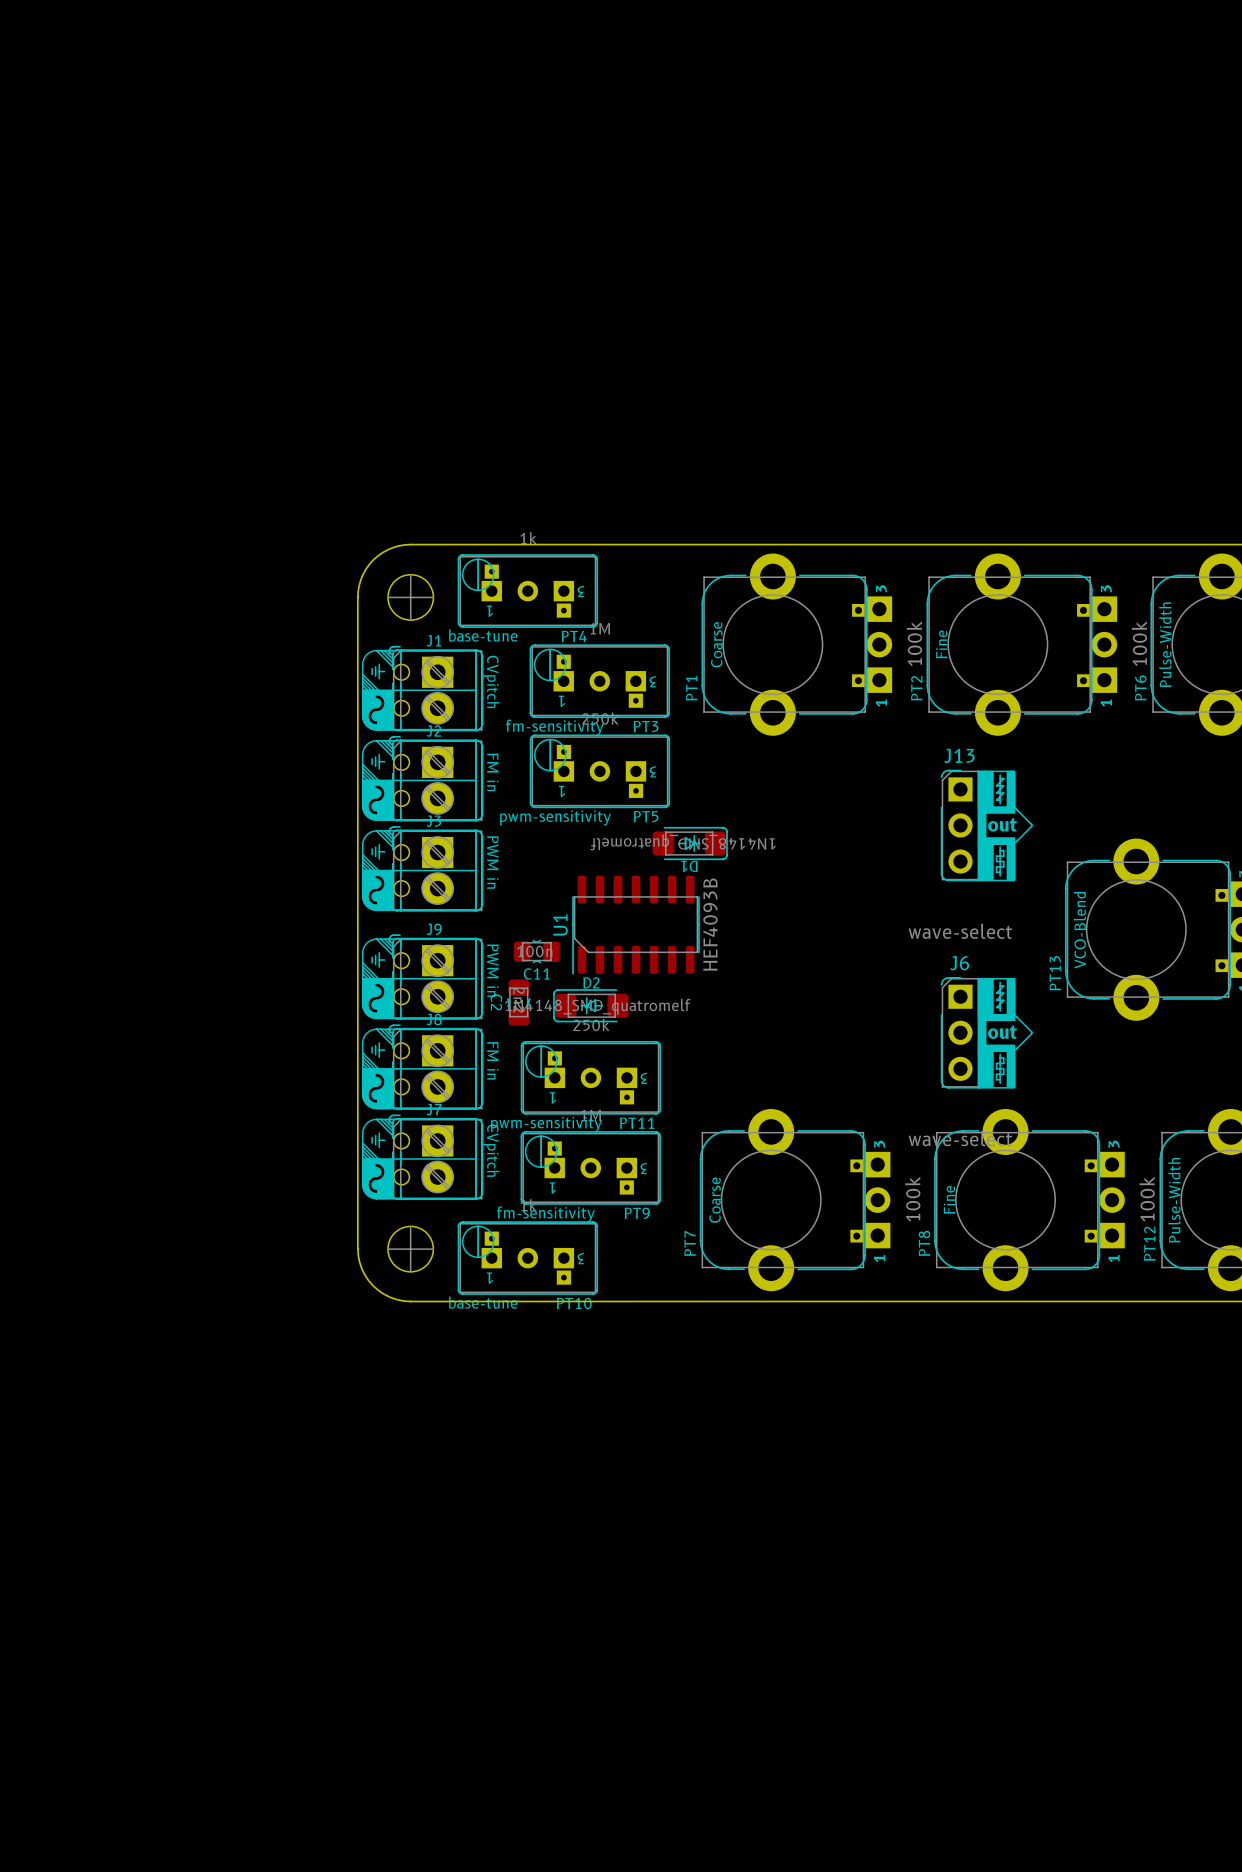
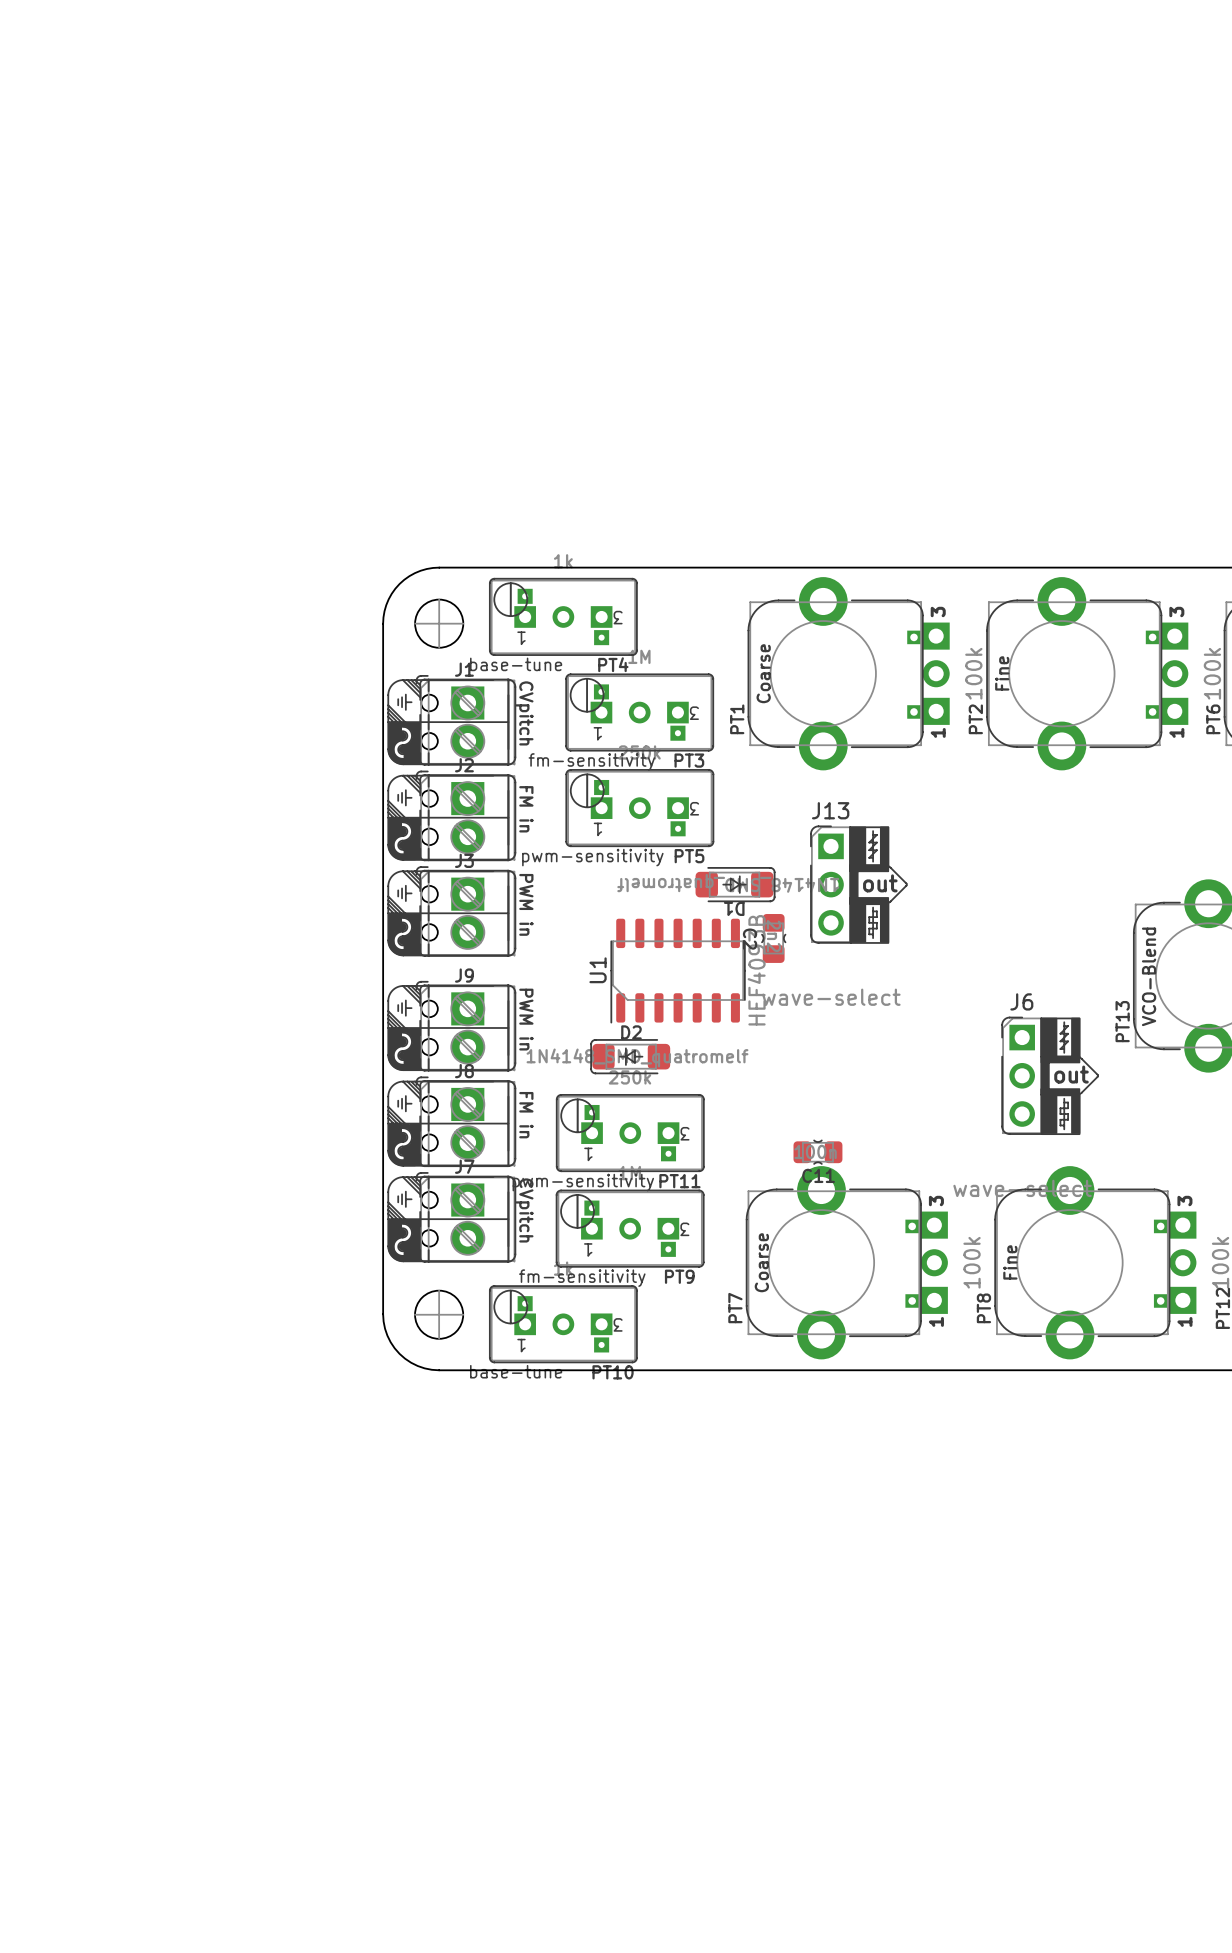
J13 footprint: [940, 769, 1033, 882] -> [810, 825, 908, 944]
C11 position: (536, 951) -> (817, 1152)
J6 footprint: [940, 977, 1033, 1089] -> [1001, 1016, 1099, 1135]
C2 position: (518, 1002) -> (773, 938)

